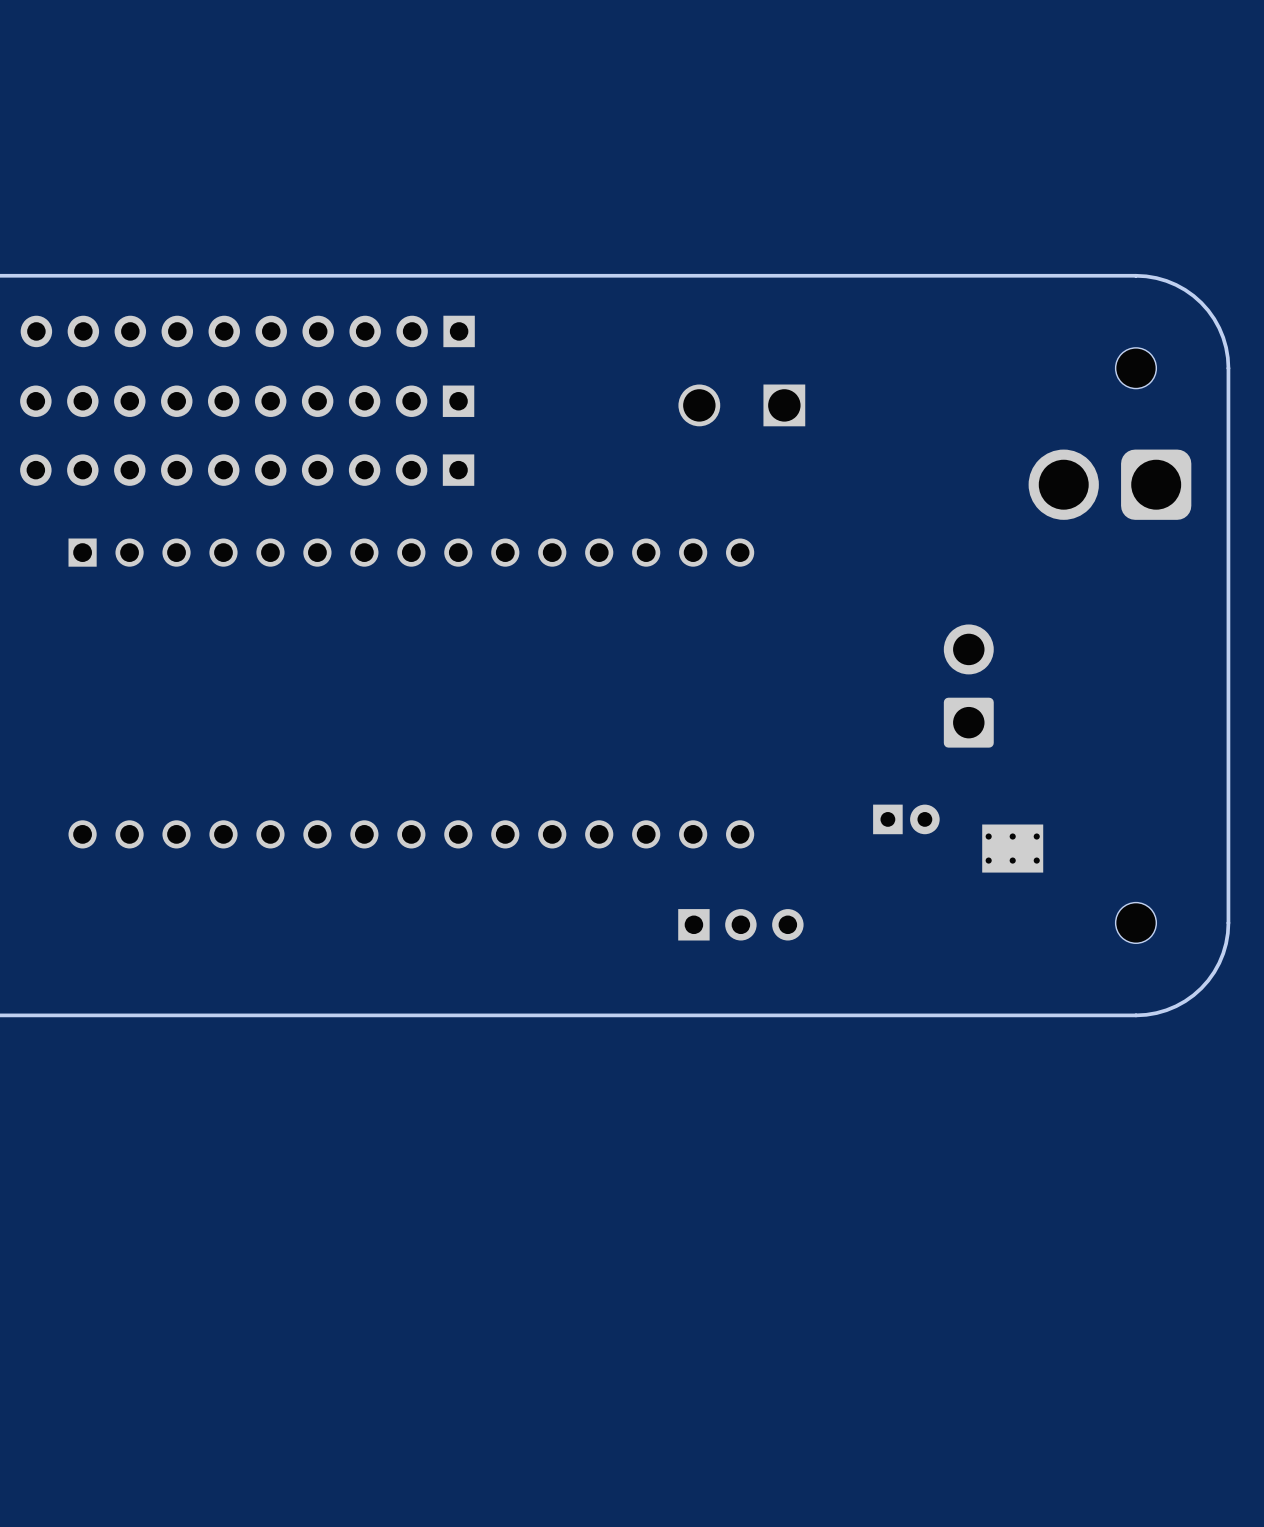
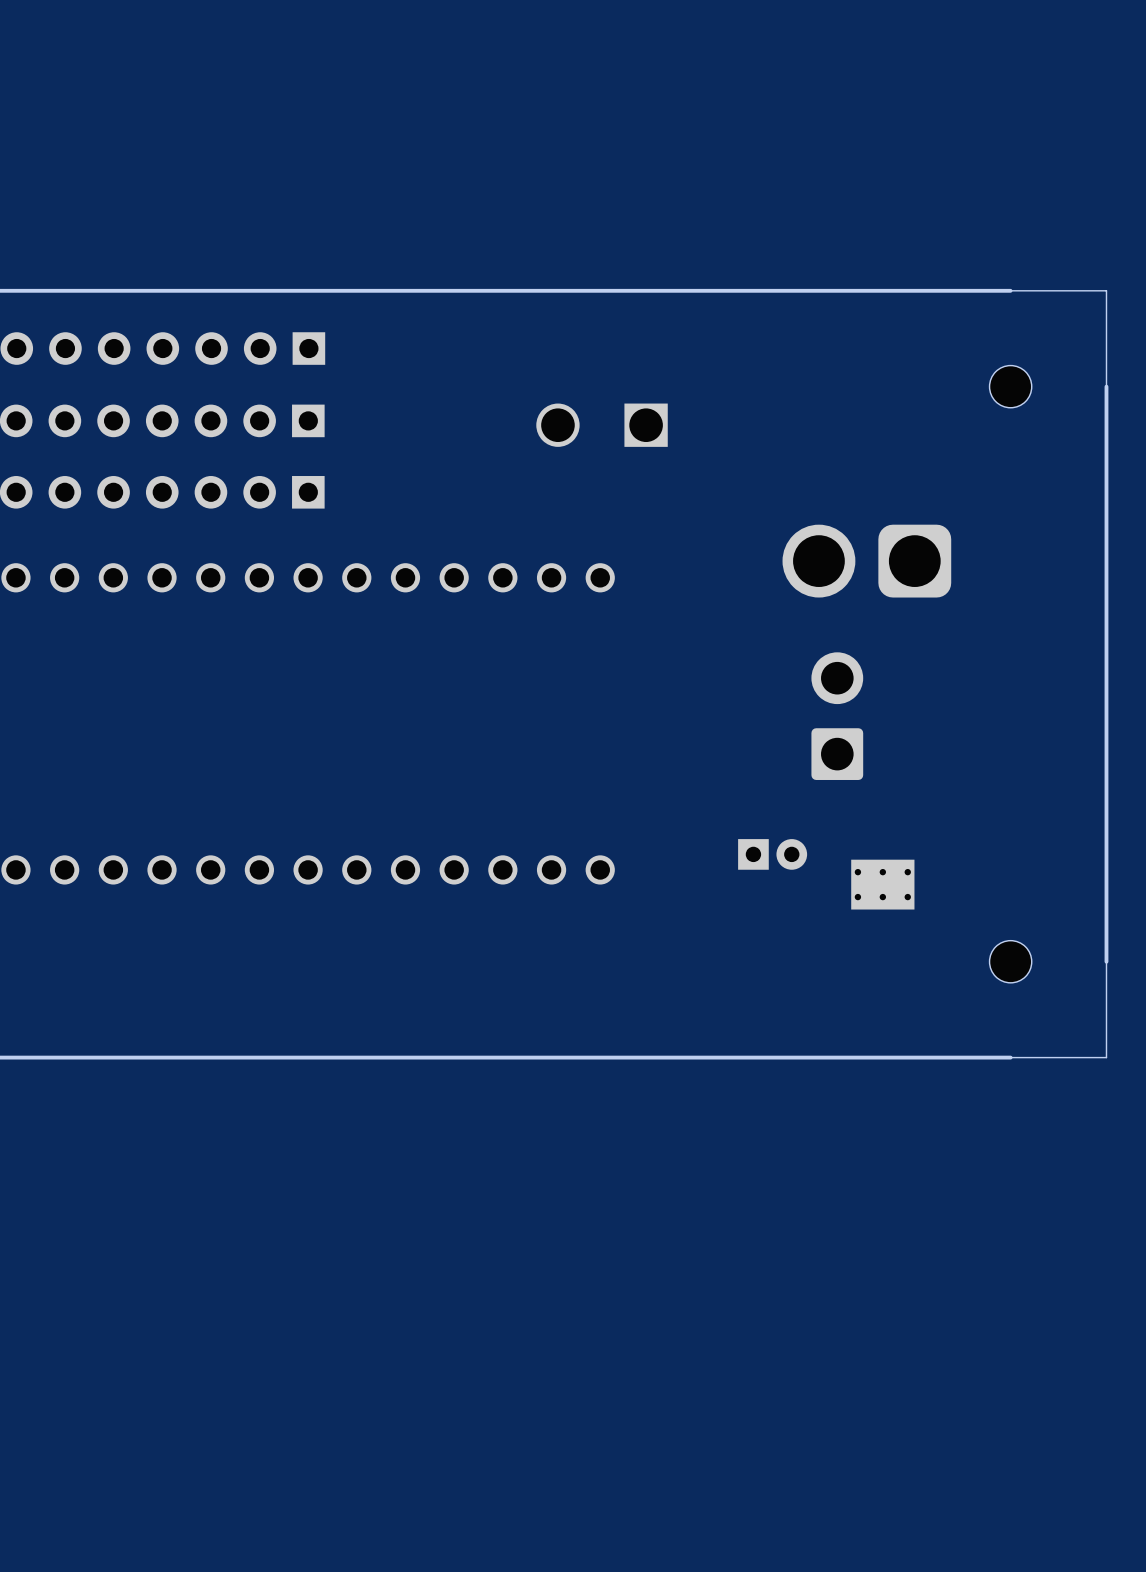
board edge: (1135, 275) (1156, 278) (1176, 284) (1201, 302) (1219, 328) (1226, 347) (1228, 368) -> (1010, 290) (1106, 290) (1106, 386)
part position: (1109, 484) -> (866, 561)
board edge: (1228, 922) (1223, 953) (1214, 972) (1201, 988) (1185, 1001) (1166, 1010) (1135, 1015) -> (1106, 961) (1106, 1057) (1010, 1057)
part: (740, 924) -> none

